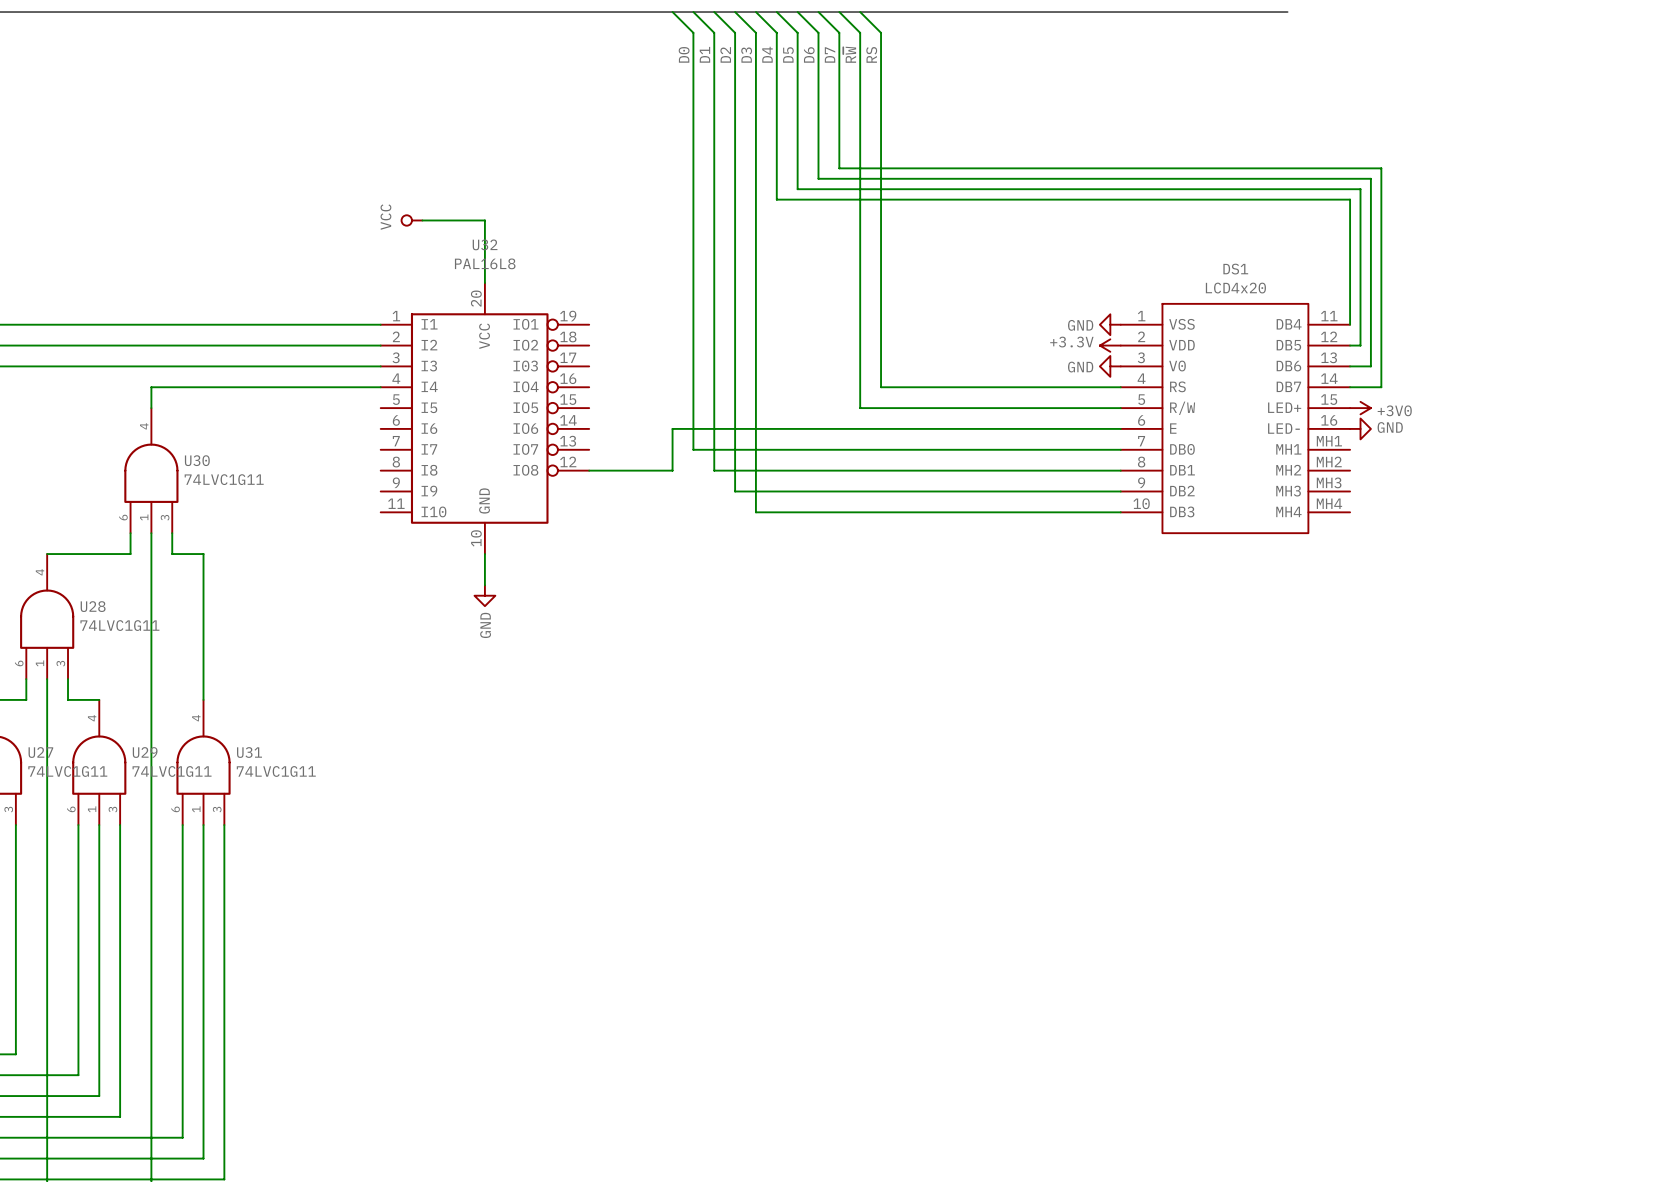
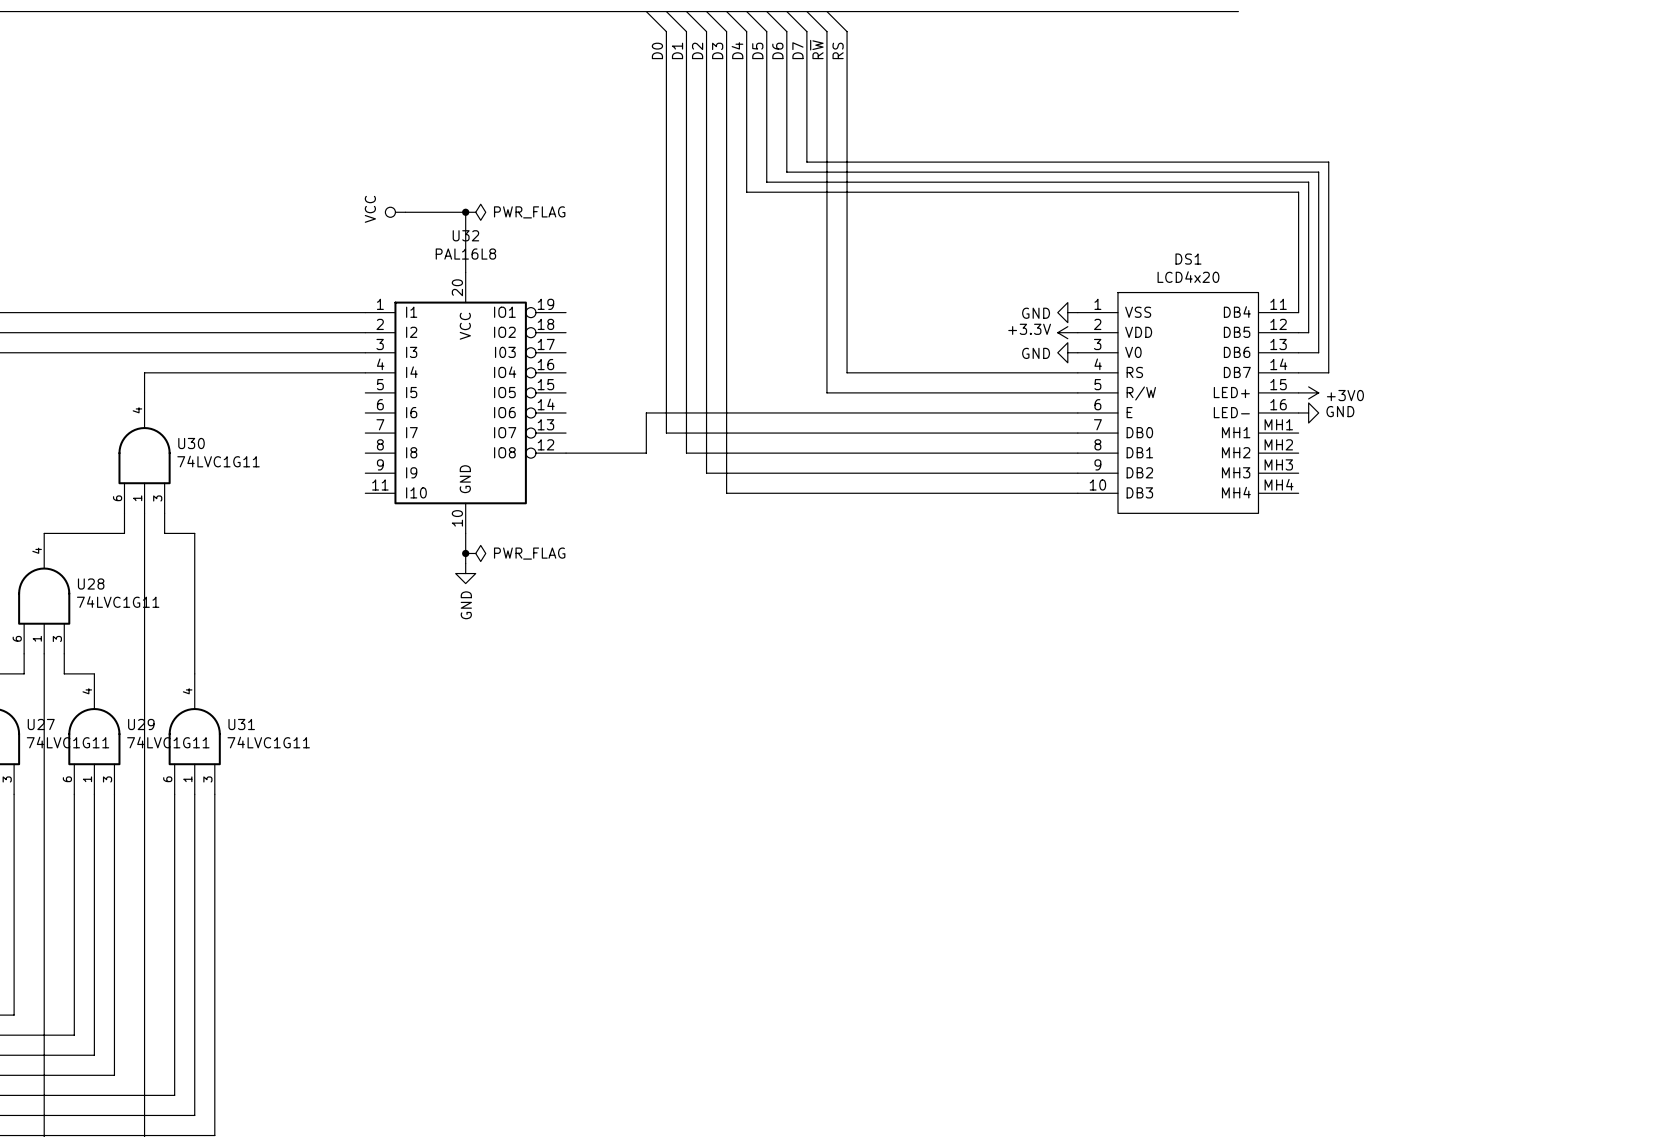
junction: none -> (465, 212)
power symbol: none -> PWR_FLAG (475, 212)
junction: none -> (465, 553)
power symbol: none -> PWR_FLAG (475, 553)

